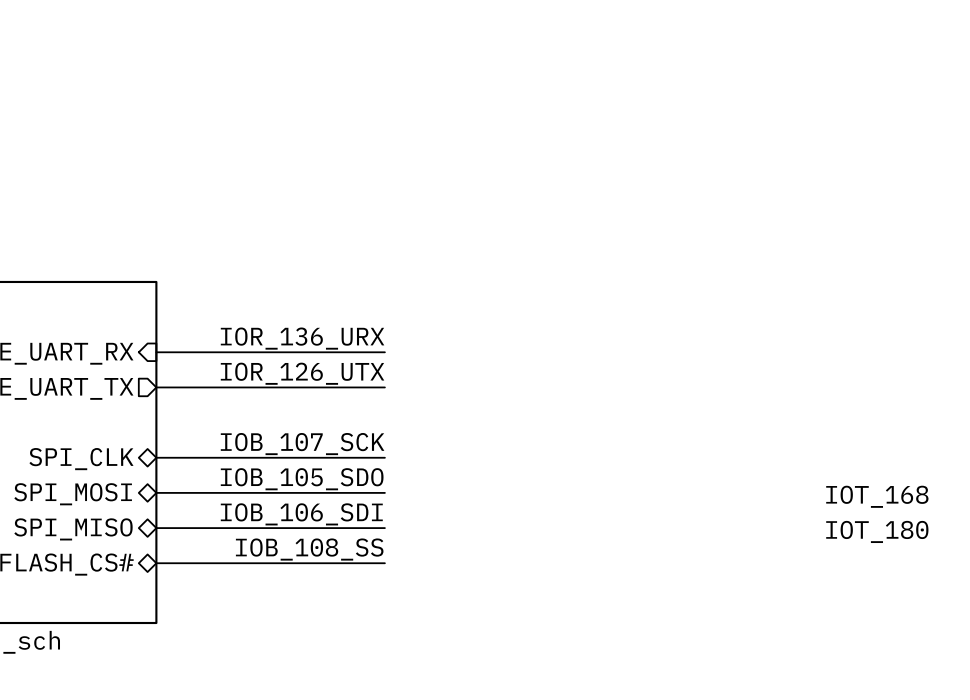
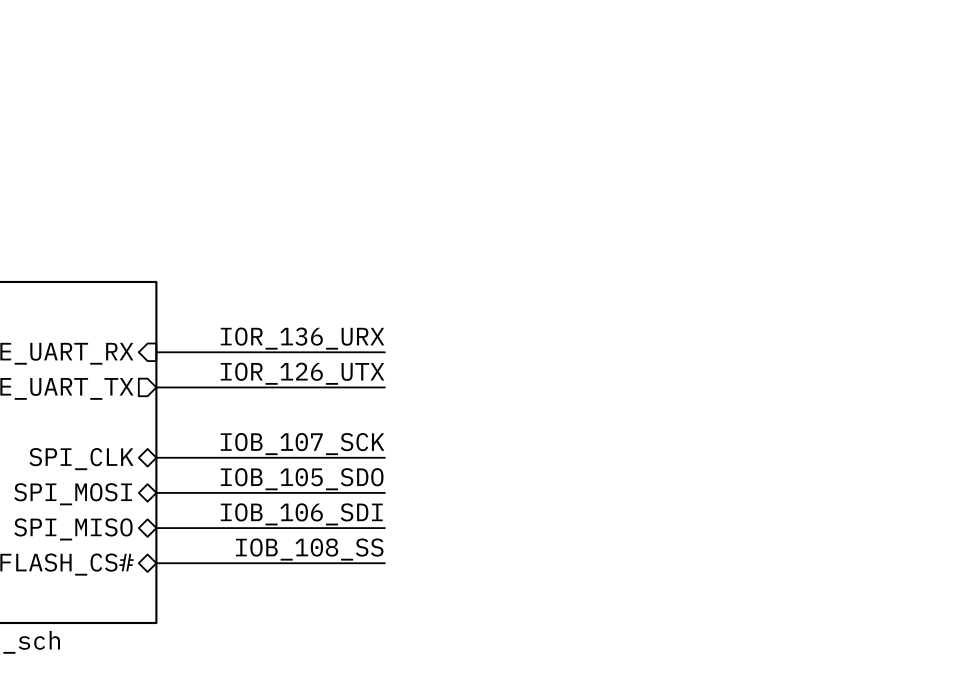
label: IOT_168 (877, 496) -> none
label: IOT_180 (877, 531) -> none

